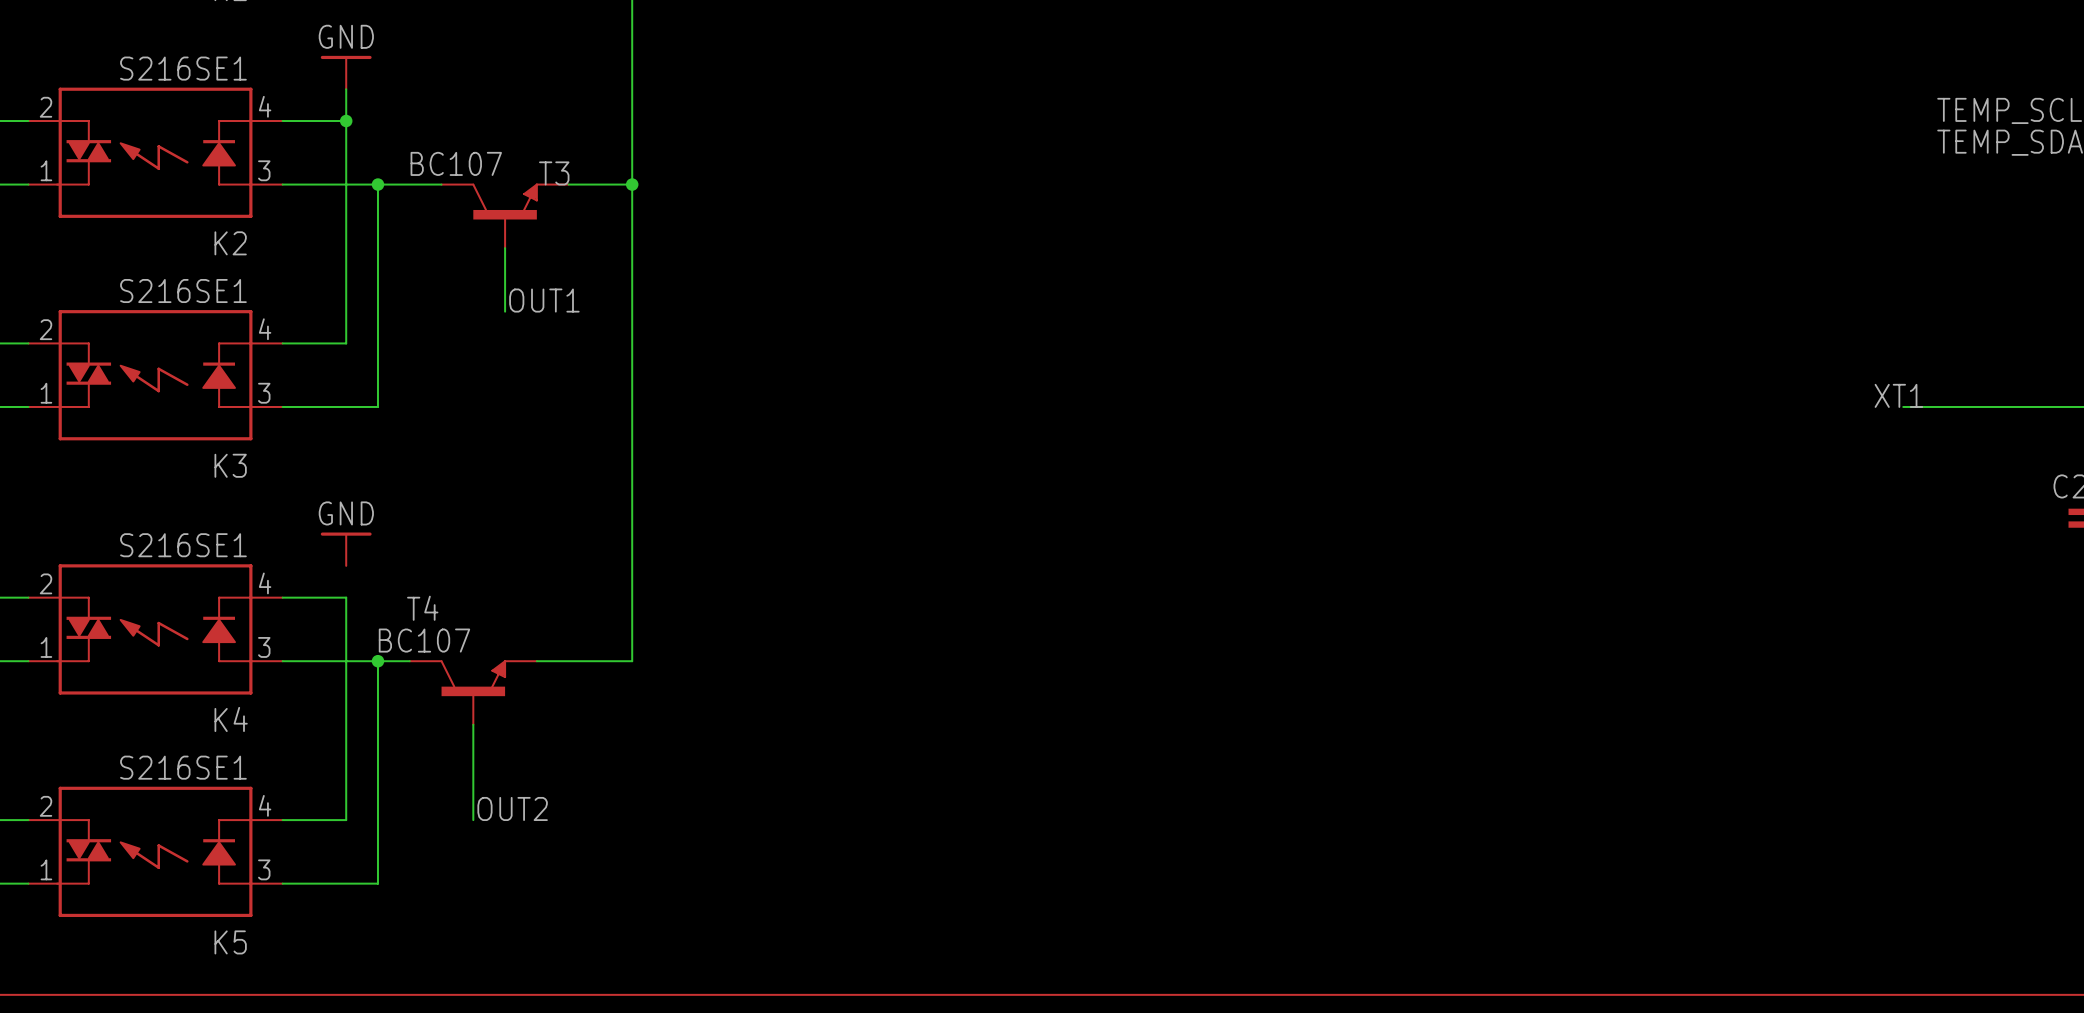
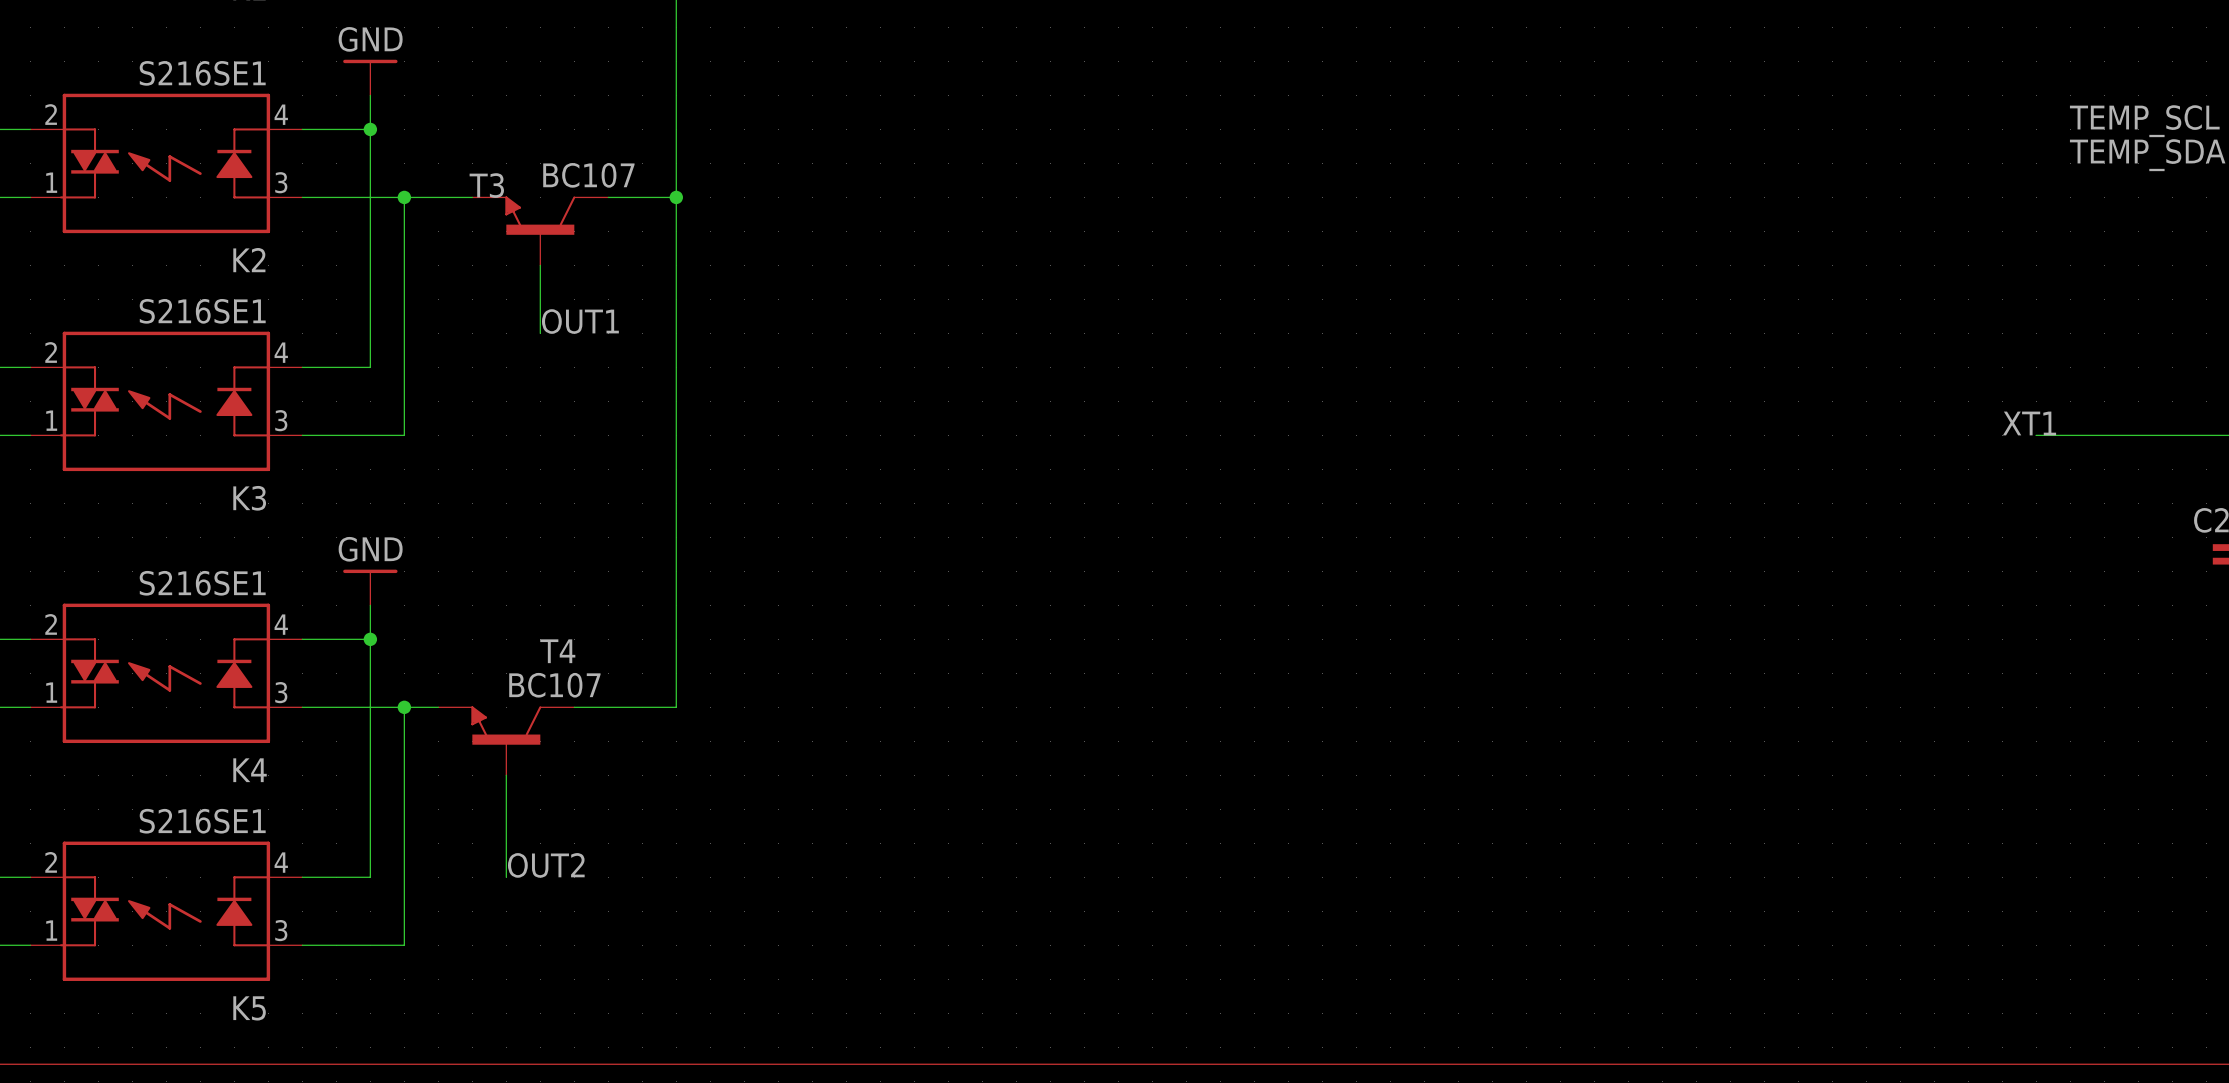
T3 flip: as is (505, 201) -> left-right (540, 215)
wire: none -> (370, 605) (370, 639)
junction: none -> (370, 639)
T4 flip: as is (473, 678) -> left-right (506, 725)

